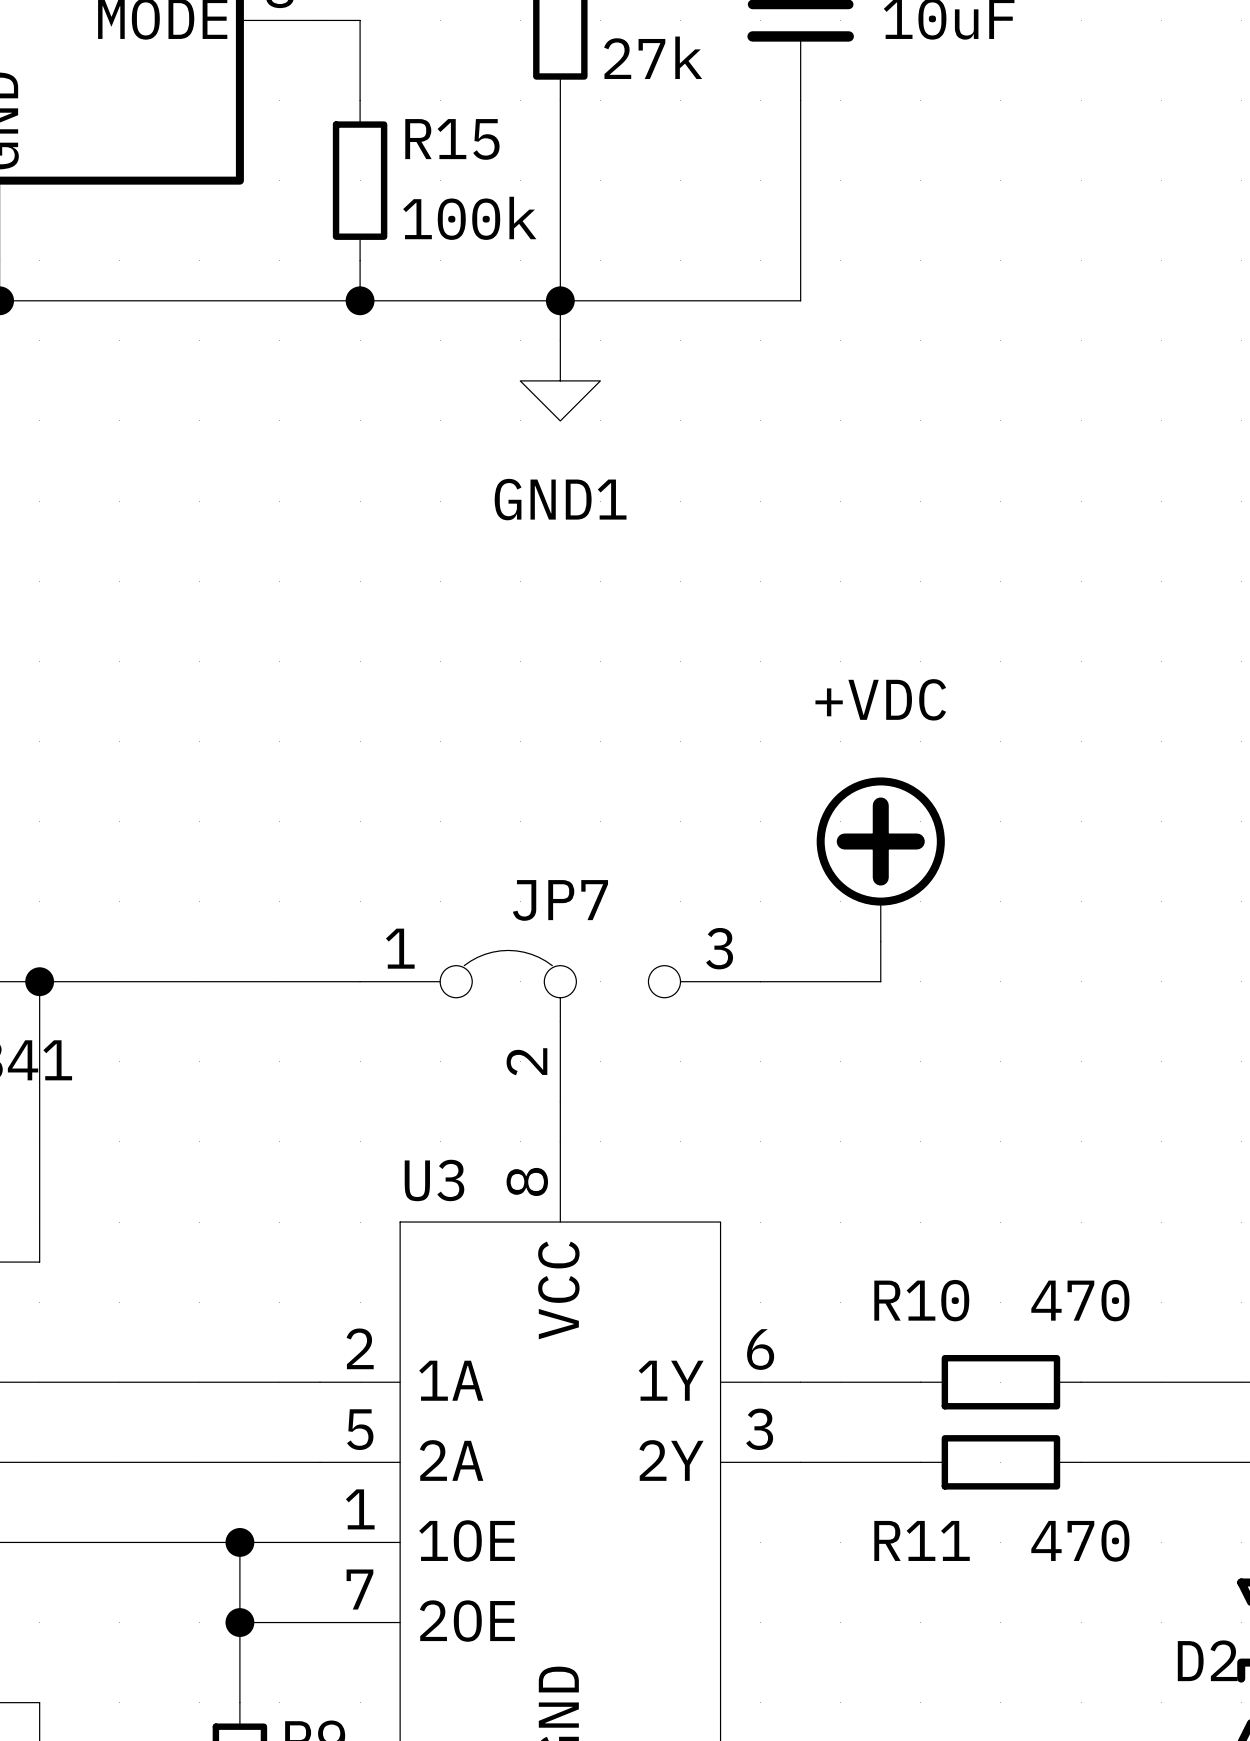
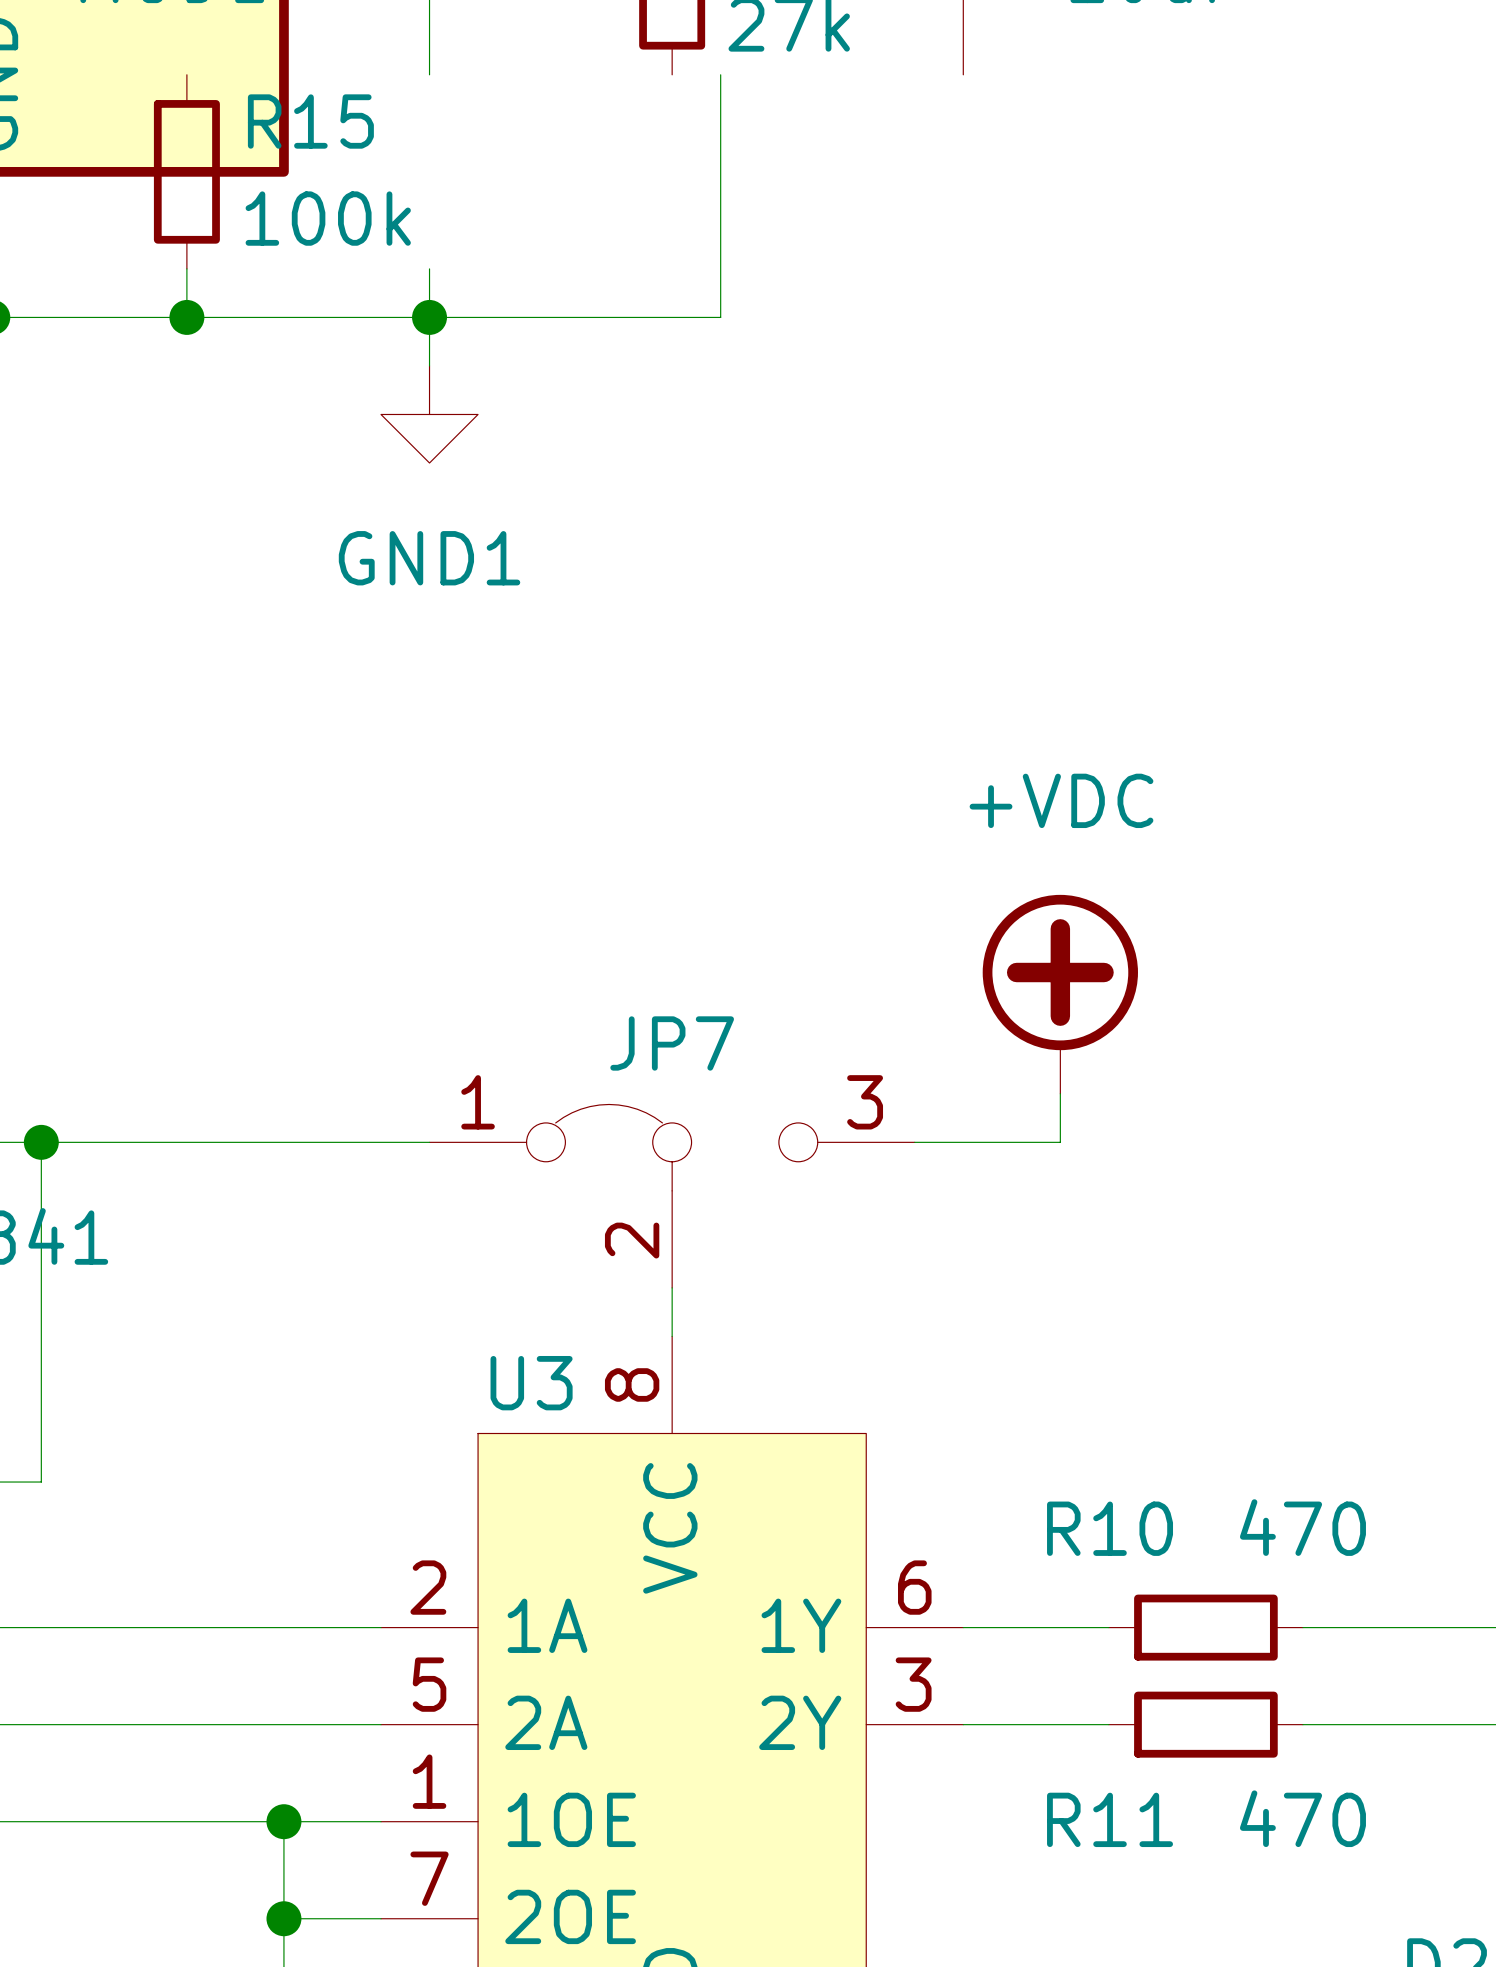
wire: (560, 100) (560, 340) -> none
wire: (800, 100) (800, 300) (600, 300) -> (720, 74) (720, 317)
R15 position: (360, 180) -> (186, 171)
wire: none -> (186, 268) (186, 317)
junction: none -> (186, 317)
wire: none -> (429, 317) (429, 365)
junction: (560, 300) -> none
power symbol position: GND1 (560, 380) -> GND1 (429, 414)

